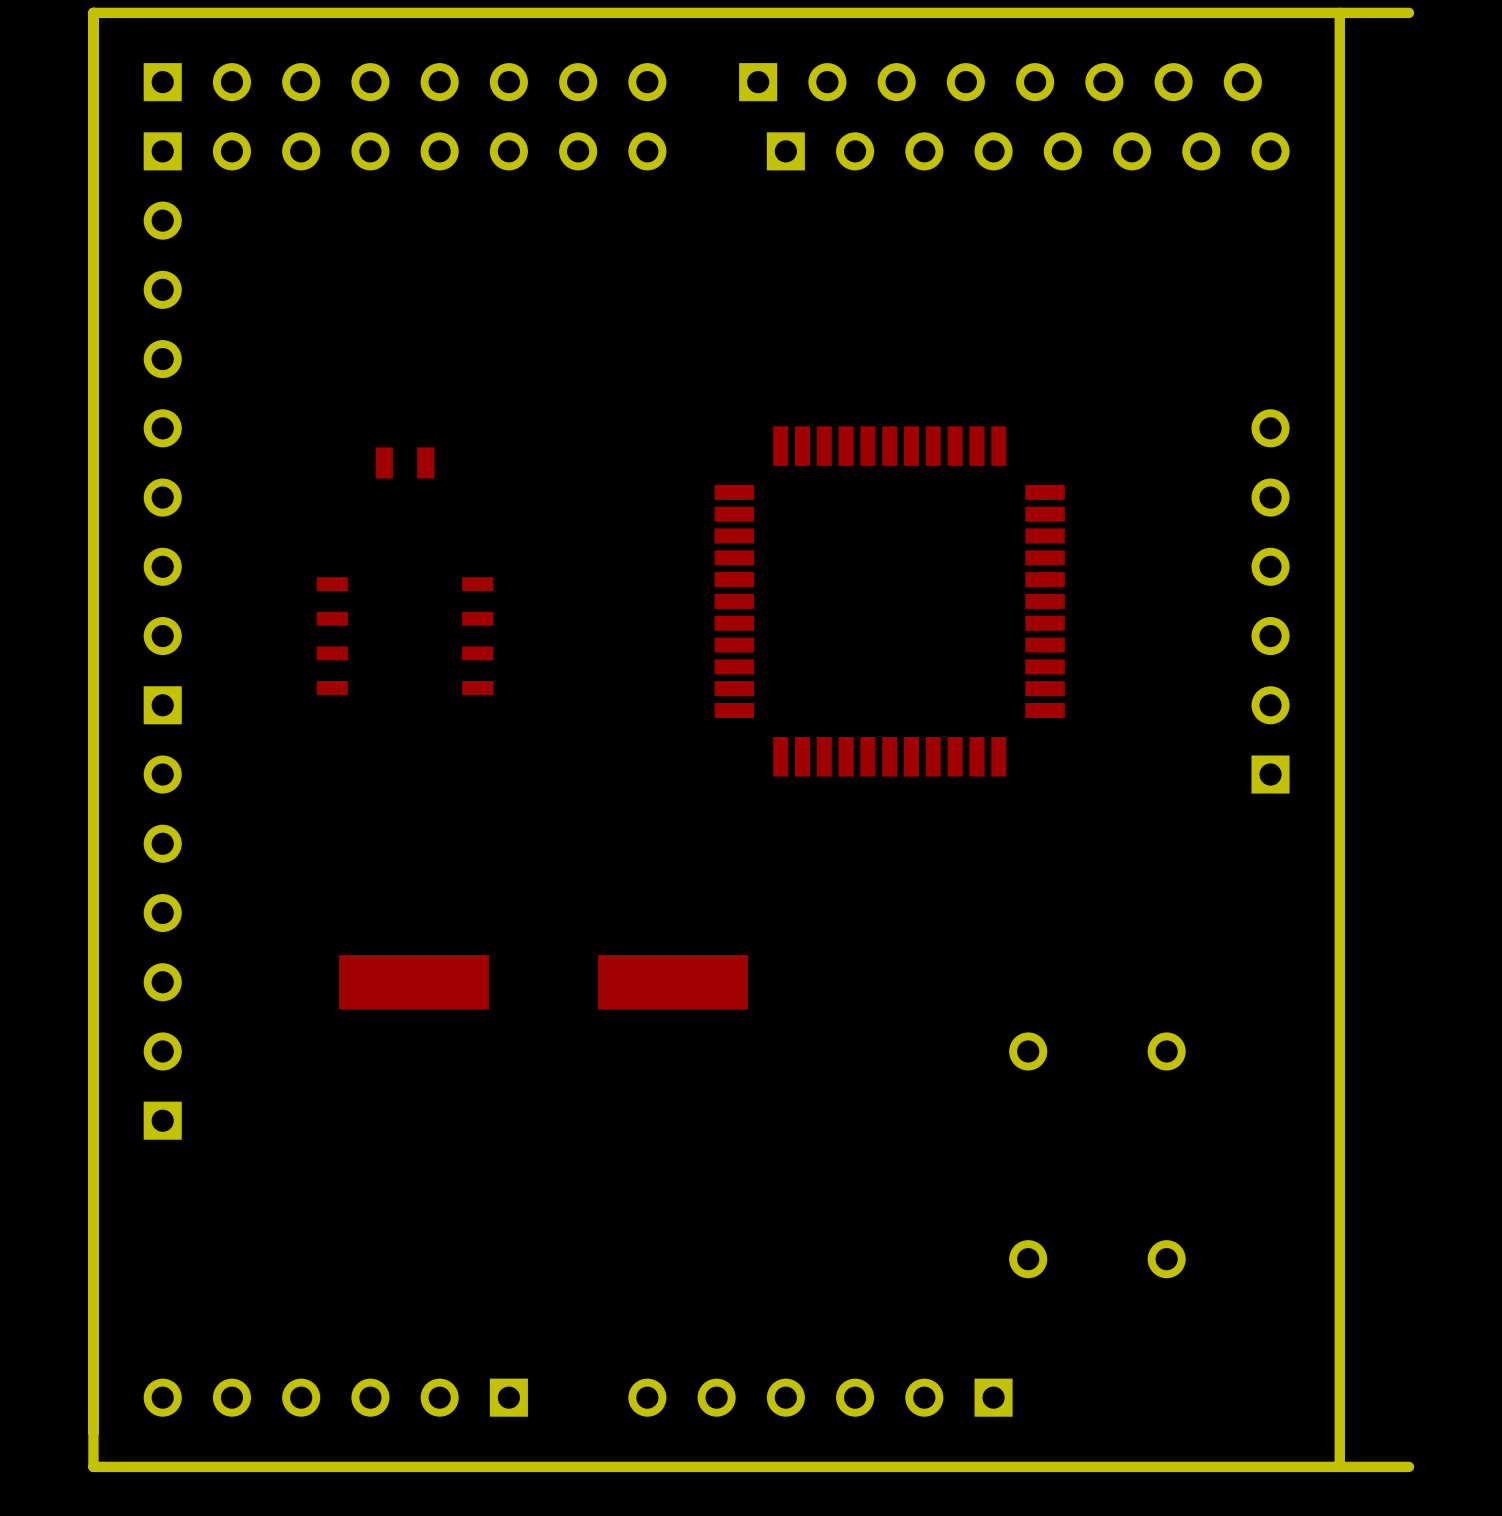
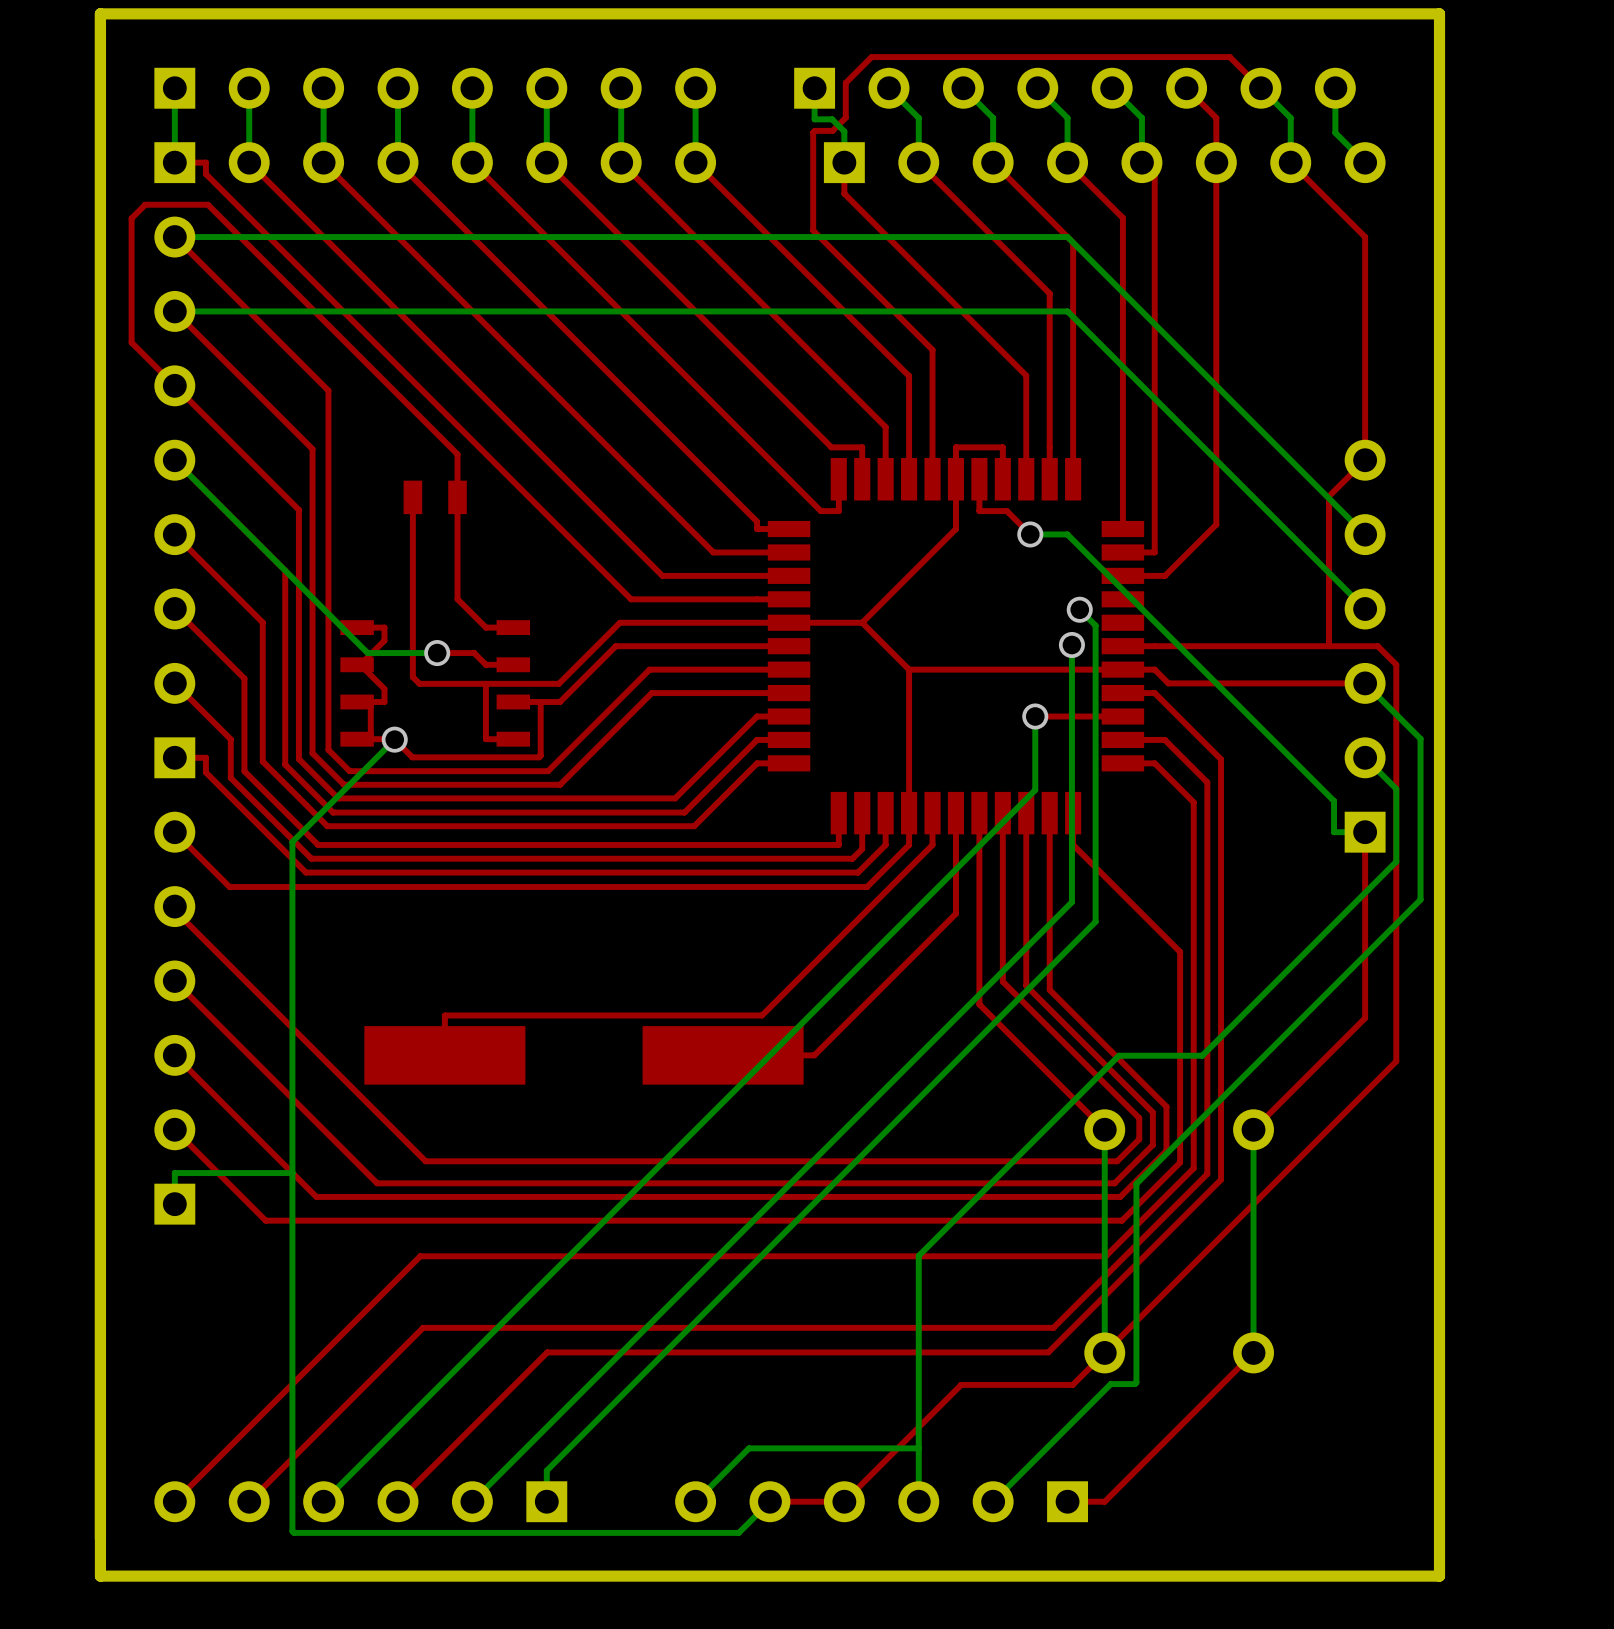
board edge: (1408, 12) (1339, 12) -> none
bottom track: none -> (174, 88) (174, 162)
bottom track: none -> (249, 88) (249, 162)
bottom track: none -> (323, 88) (323, 162)
bottom track: none -> (398, 88) (398, 162)
bottom track: none -> (472, 88) (472, 162)
bottom track: none -> (546, 88) (546, 162)
bottom track: none -> (621, 88) (621, 162)
bottom track: none -> (695, 88) (695, 162)
bottom track: none -> (814, 88) (814, 119) (832, 119) (844, 131) (844, 162)
bottom track: none -> (889, 88) (918, 118) (918, 162)
bottom track: none -> (963, 88) (993, 118) (993, 162)
bottom track: none -> (1037, 88) (1067, 118) (1067, 162)
bottom track: none -> (1112, 88) (1141, 118) (1141, 162)
top track: none -> (1186, 88) (1216, 118) (1216, 524) (1165, 575) (1122, 575)
top track: none -> (1260, 88) (1229, 57) (871, 57) (845, 82) (845, 117) (832, 130) (813, 132) (813, 230) (932, 349) (932, 479)
bottom track: none -> (1260, 88) (1290, 118) (1290, 162)
bottom track: none -> (1335, 88) (1335, 132) (1365, 162)
top track: none -> (174, 162) (205, 162) (205, 174) (631, 599) (789, 599)
top track: none -> (249, 162) (662, 575) (789, 575)
top track: none -> (323, 162) (713, 552) (789, 552)
top track: none -> (398, 162) (757, 521) (757, 529) (789, 529)
top track: none -> (472, 162) (820, 511) (838, 511) (838, 479)
top track: none -> (546, 162) (831, 447) (862, 447) (862, 479)
top track: none -> (621, 162) (885, 427) (885, 479)
top track: none -> (695, 162) (909, 376) (909, 479)
top track: none -> (844, 162) (844, 193) (1026, 375) (1026, 479)
top track: none -> (918, 162) (1049, 293) (1049, 479)
top track: none -> (993, 162) (1073, 242) (1073, 479)
top track: none -> (1067, 162) (1122, 217) (1122, 529)
top track: none -> (1141, 162) (1154, 175) (1154, 552) (1122, 552)
top track: none -> (1290, 162) (1365, 237) (1365, 460) (1328, 496) (1328, 646)
top track: none -> (174, 237) (328, 390) (328, 749) (349, 771) (548, 771) (649, 669) (789, 669)
bottom track: none -> (174, 237) (1067, 237) (1365, 534)
top track: none -> (174, 311) (312, 449) (312, 753) (344, 784) (560, 784) (651, 693) (789, 693)
bottom track: none -> (174, 311) (1067, 311) (1365, 609)
top track: none -> (174, 460) (285, 570) (285, 764) (333, 812) (684, 812) (757, 739) (789, 739)
bottom track: none -> (174, 460) (367, 653) (437, 653)
top track: none -> (979, 479) (979, 511) (1006, 511) (1030, 534)
top track: none -> (1002, 479) (1002, 447) (955, 447) (955, 529) (862, 622)
top track: none -> (412, 497) (412, 677) (419, 683) (558, 683) (619, 622) (862, 622)
top track: none -> (174, 534) (262, 622) (262, 761) (327, 826) (694, 826) (757, 763) (789, 763)
bottom track: none -> (1030, 534) (1067, 534) (1334, 801) (1334, 832) (1365, 832)
via: none -> (1030, 534)
top track: none -> (174, 609) (244, 678) (244, 771) (318, 844) (838, 844) (838, 813)
bottom track: none -> (1079, 609) (1095, 625) (1095, 921) (546, 1470) (546, 1501)
via: none -> (1079, 609)
top track: none -> (862, 622) (909, 669)
top track: none -> (357, 627) (384, 627) (384, 640) (360, 664)
top track: none -> (513, 627) (485, 627) (457, 599) (457, 454) (207, 204) (145, 204) (131, 218) (131, 342) (298, 509) (298, 759) (338, 798) (675, 798) (757, 716) (789, 716)
bottom track: none -> (1071, 645) (1071, 902) (472, 1501)
via: none -> (1071, 645)
top track: none -> (789, 646) (615, 646) (560, 701) (513, 701)
top track: none -> (1122, 646) (1377, 646) (1396, 664) (1396, 1061) (1072, 1384) (961, 1384) (844, 1501) (769, 1501)
top track: none -> (437, 653) (474, 653) (485, 664) (513, 664)
via: none -> (437, 653)
top track: none -> (360, 664) (384, 688) (384, 701) (357, 701)
top track: none -> (909, 669) (909, 844) (867, 887) (229, 887) (174, 832)
top track: none -> (909, 669) (1154, 669) (1168, 683) (1365, 683)
top track: none -> (174, 683) (230, 739) (230, 777) (311, 858) (852, 858) (862, 848) (862, 813)
top track: none -> (485, 683) (485, 739) (513, 739)
bottom track: none -> (1365, 683) (1420, 738) (1420, 899) (1136, 1183) (1136, 1382) (1134, 1384) (1110, 1384) (993, 1501)
top track: none -> (1122, 693) (1154, 693) (1221, 759) (1221, 1179) (1048, 1352) (547, 1352) (398, 1501)
top track: none -> (370, 701) (370, 739)
top track: none -> (540, 701) (540, 755) (539, 757) (412, 757) (394, 739) (357, 739)
bottom track: none -> (1035, 716) (1035, 790) (323, 1501)
via: none -> (1035, 716)
top track: none -> (1122, 716) (1035, 716)
bottom track: none -> (394, 739) (292, 841) (292, 1531) (294, 1532) (738, 1532) (769, 1501)
via: none -> (394, 739)
top track: none -> (1122, 739) (1164, 739) (1207, 782) (1207, 1174) (1053, 1327) (423, 1327) (249, 1501)
top track: none -> (174, 757) (205, 757) (205, 772) (305, 872) (858, 872) (885, 844) (885, 813)
bottom track: none -> (1365, 757) (1396, 788) (1396, 861) (1202, 1055) (1118, 1055) (918, 1255) (918, 1501)
top track: none -> (1122, 763) (1154, 763) (1193, 802) (1193, 1168) (1105, 1256) (420, 1256) (174, 1501)
top track: none -> (932, 813) (932, 844) (762, 1015) (444, 1015) (444, 1055)
top track: none -> (955, 813) (955, 913) (814, 1055) (723, 1055)
top track: none -> (979, 813) (979, 1004) (1104, 1129)
top track: none -> (1002, 813) (1002, 981) (1139, 1118) (1139, 1139) (1117, 1161) (425, 1161) (174, 910) (174, 906)
top track: none -> (1026, 813) (1026, 985) (1152, 1112) (1152, 1145) (1114, 1183) (377, 1183) (174, 980)
top track: none -> (1049, 813) (1049, 989) (1166, 1106) (1166, 1150) (1120, 1196) (316, 1196) (174, 1055)
top track: none -> (1073, 813) (1073, 844) (1180, 951) (1180, 1162) (1122, 1220) (265, 1220) (174, 1129)
top track: none -> (1365, 832) (1365, 1018) (1253, 1129)
bottom track: none -> (1104, 1129) (1104, 1352)
bottom track: none -> (1253, 1129) (1253, 1352)
bottom track: none -> (292, 1173) (174, 1173) (174, 1204)
top track: none -> (1253, 1352) (1104, 1501) (1067, 1501)
bottom track: none -> (918, 1448) (748, 1448) (695, 1501)
board edge: (1408, 1466) (1339, 1466) -> none

